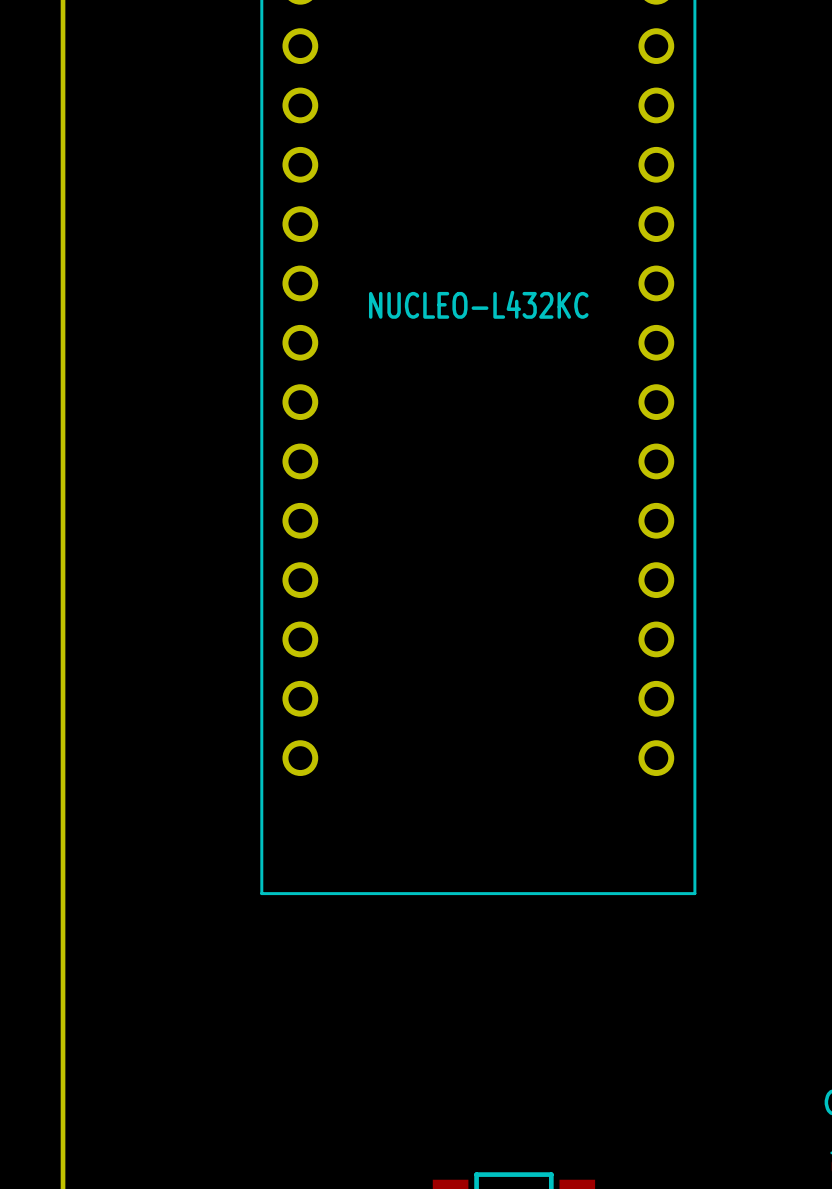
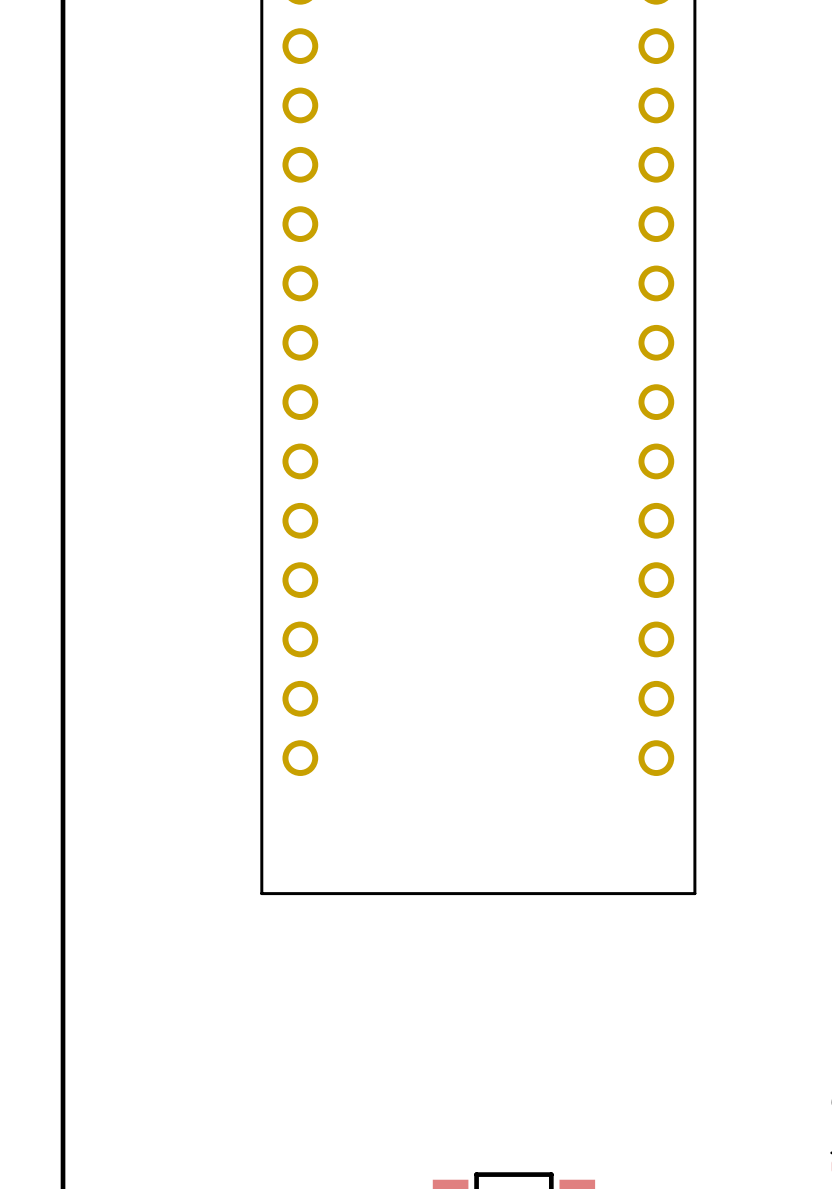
part value: NUCLEO-L432KC (478, 304) -> none

